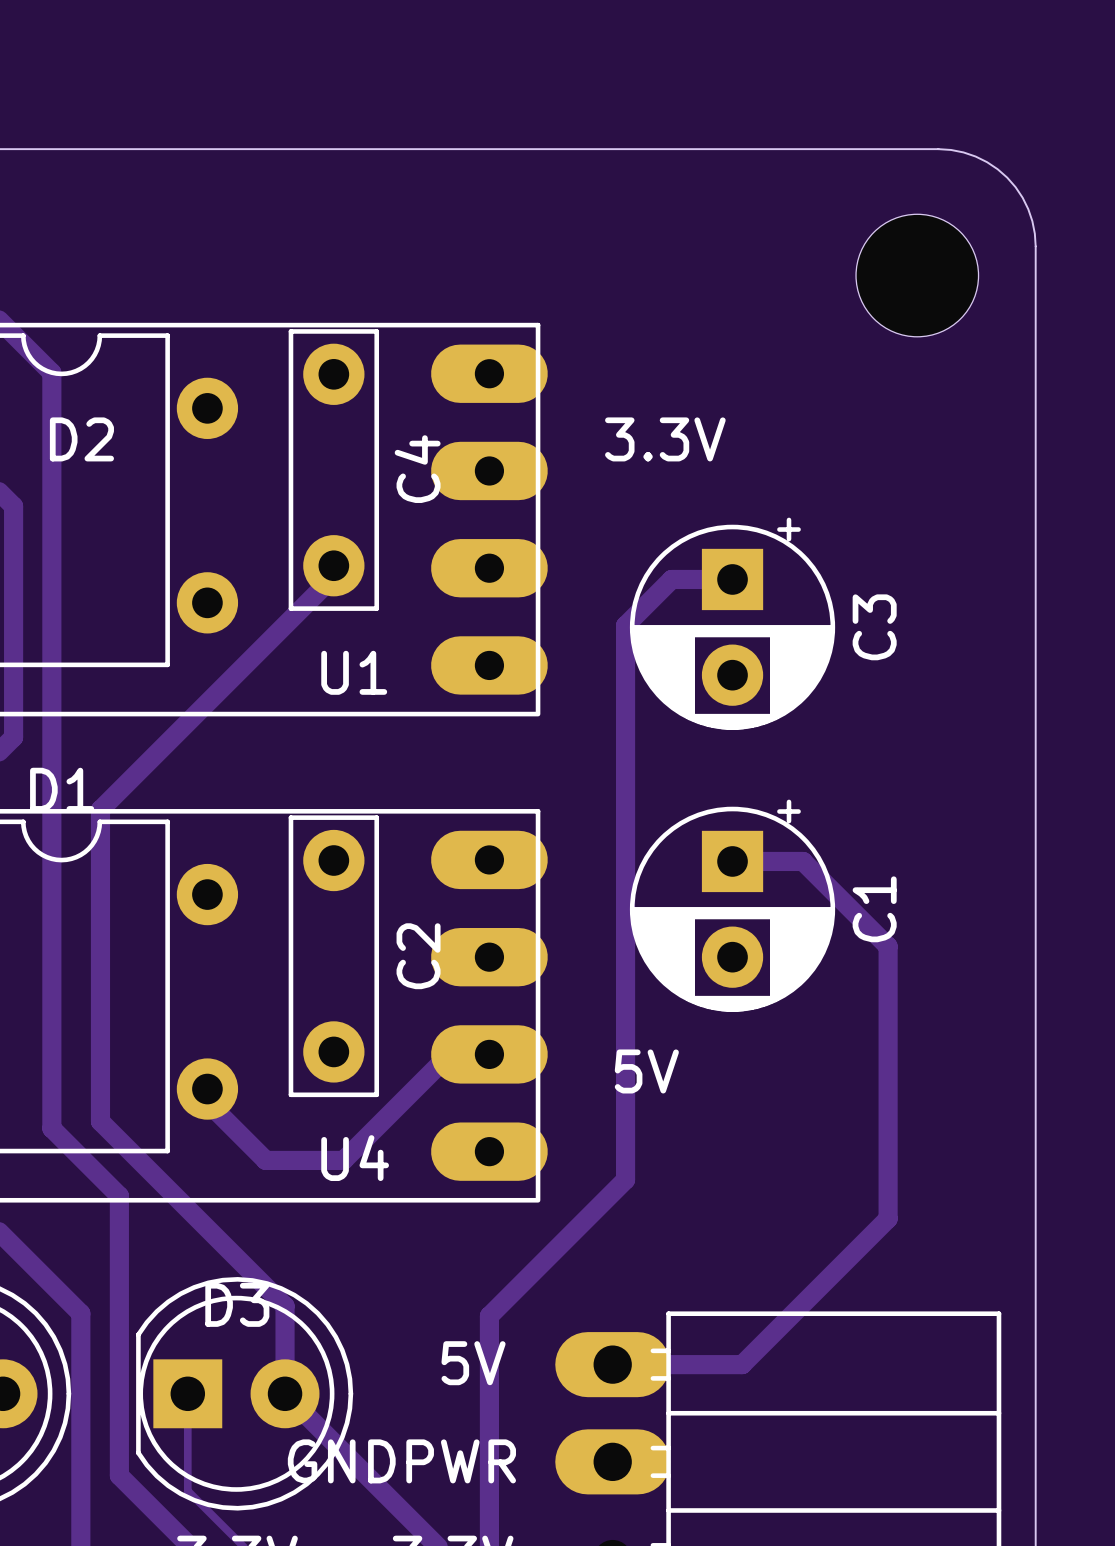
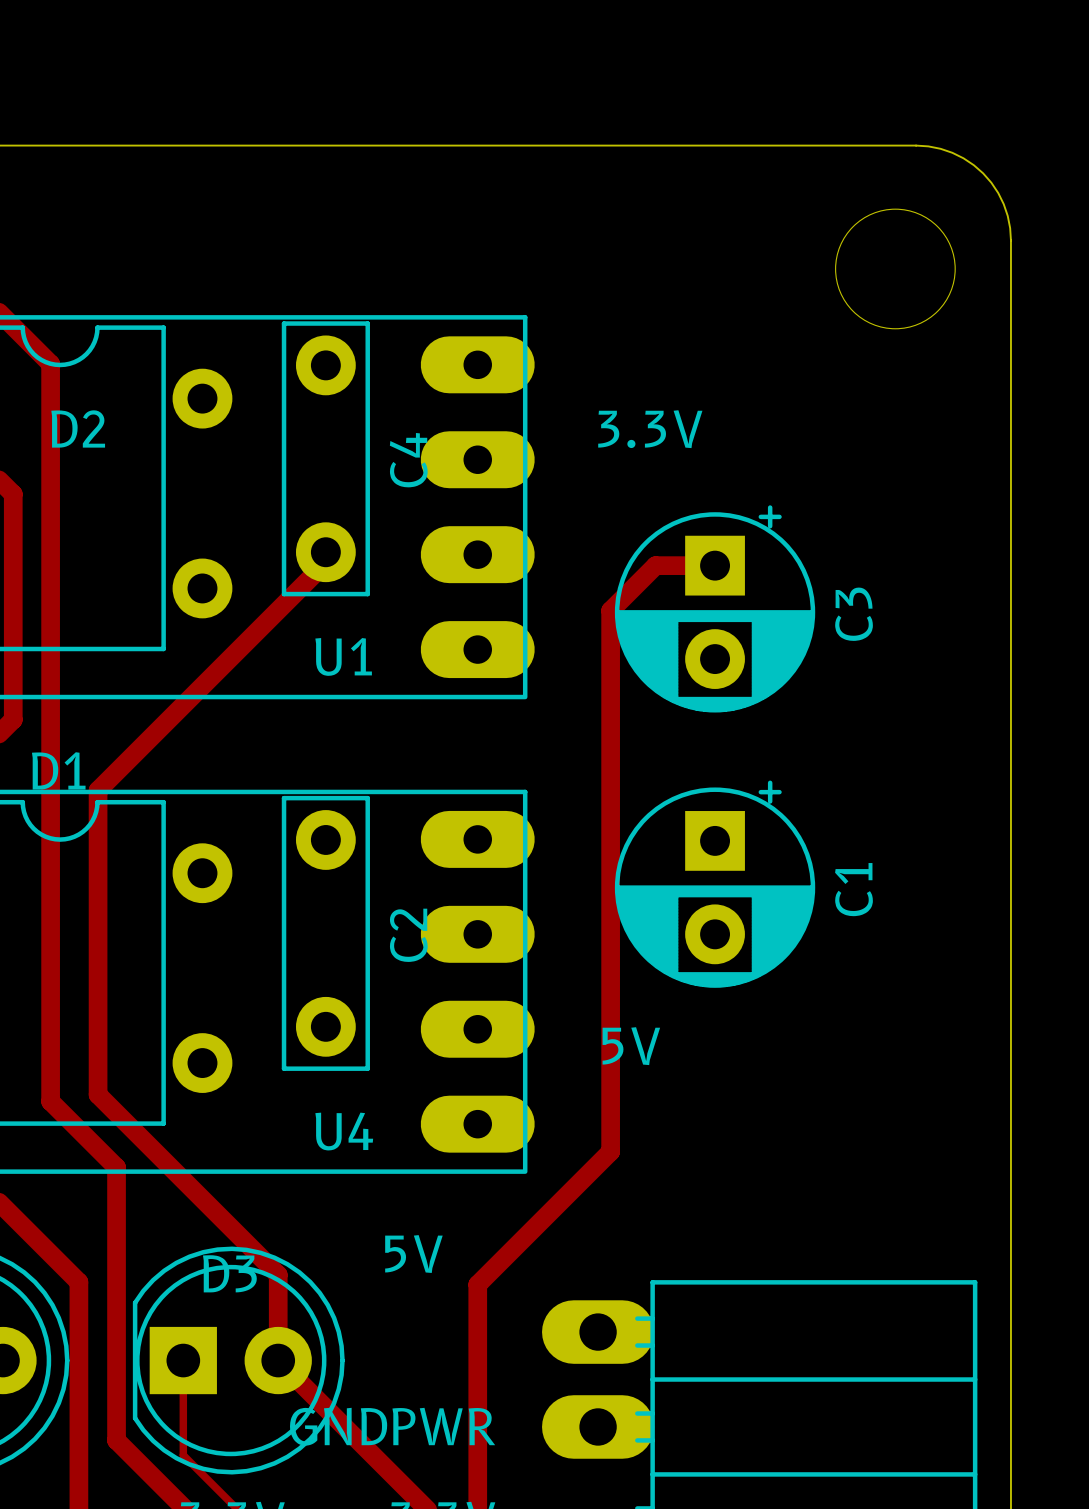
track: (732, 861) (803, 861) (888, 946) (888, 1218) (742, 1364) (612, 1364) -> none
track: (489, 1054) (449, 1054) (343, 1160) (265, 1160) (207, 1102) (207, 1089) -> none
text position: 5V (473, 1363) -> 5V (413, 1254)

